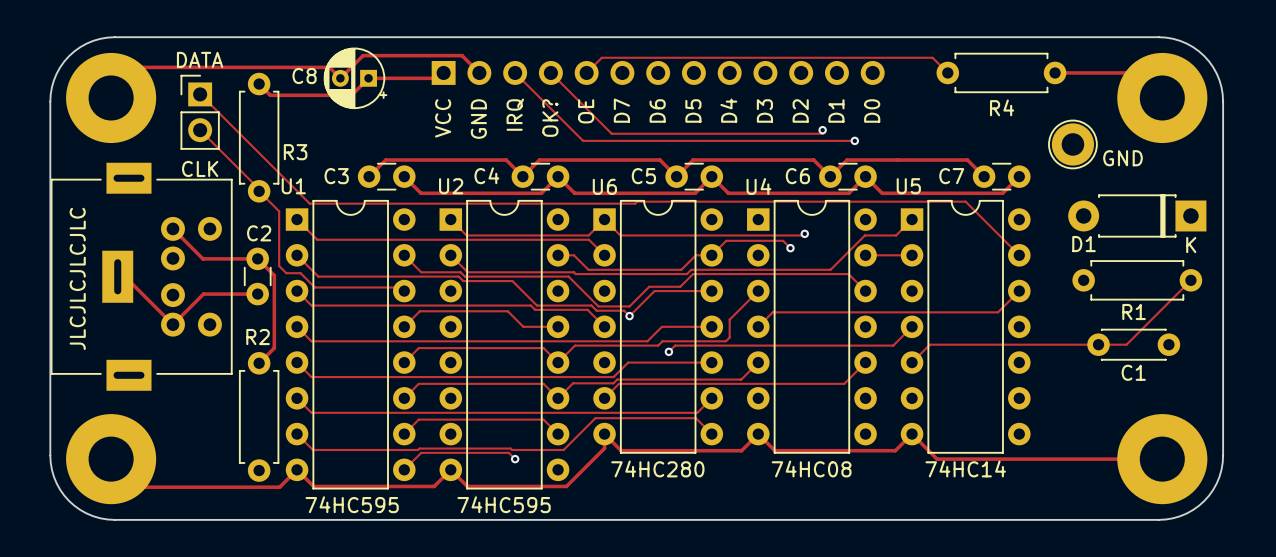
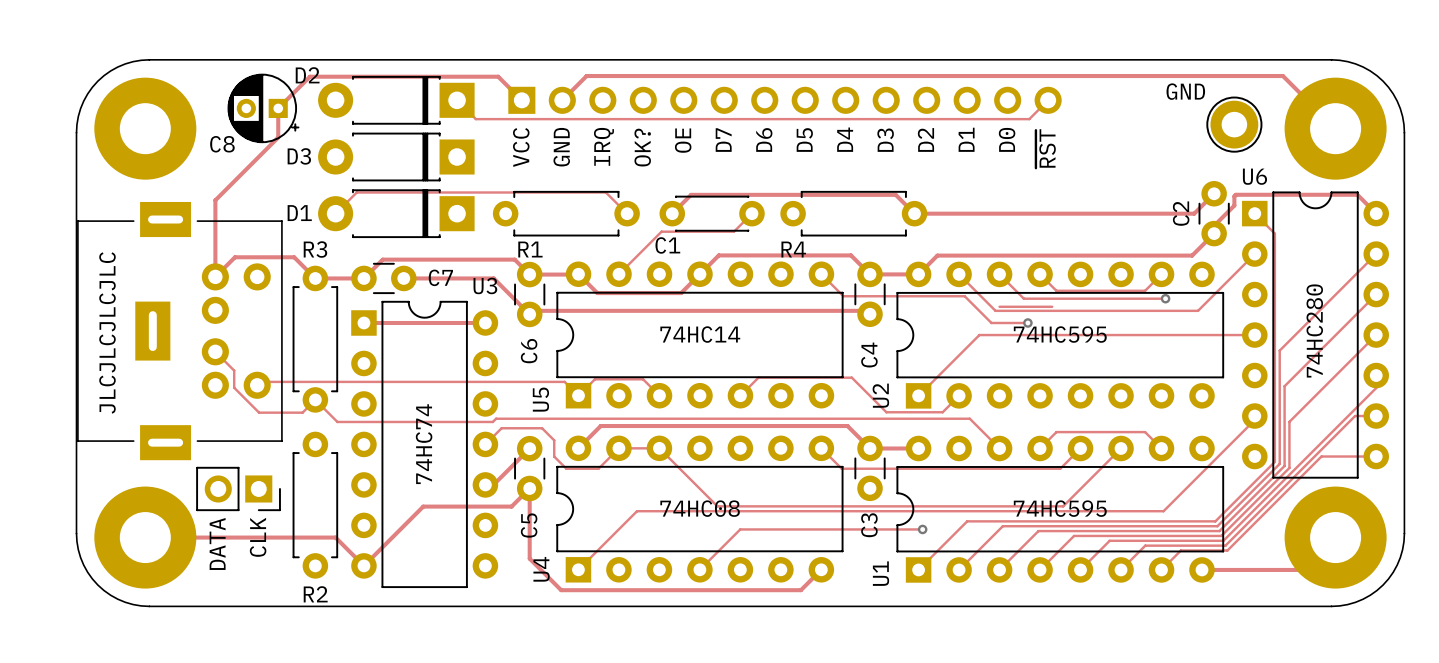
text: DATA (200, 59) -> none
track: (141, 67) (329, 67) (340, 78) (363, 55) (462, 55) (479, 72) -> (1335, 128) (1282, 76) (586, 76) (562, 100)
D2: none -> (396, 100)
track: none -> (457, 100) (475, 119) (1029, 119) (1048, 100)
track: none -> (521, 100) (498, 76) (309, 76) (278, 108) (278, 137) (215, 200) (215, 276) (235, 257) (294, 257) (310, 273)
track: (515, 72) (583, 140) (854, 140) -> none
track: (550, 72) (611, 133) (822, 133) (822, 130) -> none
track: (586, 72) (601, 57) (932, 57) (947, 72) -> none
part: (658, 72) -> none
part: none -> (785, 100)
R4 position: (1001, 72) -> (853, 213)
track: (1055, 72) (1137, 72) -> none
C8 name position: C8 (304, 76) -> C8 (222, 144)
C8 position: (355, 78) -> (263, 108)
track: (438, 78) (368, 78) (351, 95) (270, 95) (259, 84) -> none
track: (200, 94) (309, 203) (965, 201) (1019, 255) -> none
R4 name position: R4 (1002, 107) -> R4 (793, 249)
part: (200, 112) -> none
text: none -> ~{RST} (1045, 148)
D3: none -> (396, 157)
track: (200, 130) (259, 189) -> none
via: (822, 130) -> none
R3 position: (259, 137) -> (315, 339)
via: (854, 140) -> none
part position: (1072, 144) -> (1234, 124)
R3 name position: R3 (295, 152) -> R3 (315, 249)
track: none -> (1214, 193) (1194, 213) (914, 213) (895, 194) (691, 194) (672, 213)
part value position: GND (1122, 158) -> GND (1185, 91)
text rotation: 0° (200, 168) -> 90° counterclockwise (258, 537)
text position: CLK (200, 168) -> CLK (258, 537)
track: none -> (335, 213) (356, 192) (605, 192) (627, 213)
track: none -> (751, 213) (733, 231) (661, 231) (619, 274)
track: none -> (1254, 213) (1274, 233) (1274, 461) (1215, 521) (967, 521) (918, 569)
track: none -> (1376, 213) (1357, 194) (1235, 194) (1234, 205) (1214, 225)
C4 name position: C4 (486, 175) -> C4 (869, 355)
C3 name position: C3 (336, 176) -> C3 (869, 525)
track: (369, 176) (385, 160) (506, 160) (522, 176) (539, 160) (659, 160) (676, 176) (693, 160) (813, 160) (830, 176) (846, 160) (967, 160) (984, 176) -> none
C3 rotation: 0° (386, 176) -> 90° clockwise (870, 468)
C3 position: (386, 176) -> (870, 468)
track: (404, 176) (420, 193) (541, 193) (558, 176) (574, 193) (695, 193) (711, 176) (728, 193) (848, 193) (865, 176) (882, 193) (1002, 193) (1019, 176) -> none
C4 rotation: 0° (540, 176) -> 90° clockwise (870, 294)
C4 position: (540, 176) -> (870, 294)
C5 name position: C5 (643, 176) -> C5 (529, 525)
C5 rotation: 0° (694, 176) -> 90° clockwise (529, 468)
C5 position: (694, 176) -> (529, 468)
C6 name position: C6 (797, 176) -> C6 (529, 351)
C6 rotation: 0° (847, 176) -> 90° clockwise (529, 294)
C6 position: (847, 176) -> (529, 294)
C7 name position: C7 (951, 176) -> C7 (440, 277)
C7 position: (1001, 176) -> (383, 278)
track: none -> (1214, 233) (1192, 255) (937, 255) (918, 274) (870, 274) (851, 255) (718, 255) (681, 293) (597, 293) (578, 274)
track: (259, 191) (279, 211) (279, 266) (286, 273) (300, 273) (314, 287) (400, 287) -> none
track: none -> (1254, 254) (1198, 310) (995, 310) (959, 274)
track: none -> (1376, 254) (1279, 350) (1279, 463) (1217, 526) (1002, 526) (959, 569)
D1 position: (1137, 215) -> (396, 213)
track: (297, 219) (317, 239) (588, 239) (604, 255) -> none
track: (450, 219) (466, 235) (588, 235) (604, 219) (620, 235) (803, 235) (804, 233) -> none
track: (912, 219) (896, 235) (864, 235) (830, 269) (691, 269) (686, 274) (467, 272) (450, 255) -> none
track: none -> (578, 274) (529, 274) (514, 259) (382, 259) (363, 278) (315, 278)
track: none -> (821, 274) (843, 296) (964, 296) (991, 322) (1027, 322)
track: none -> (999, 274) (1023, 298) (1165, 298)
track: none -> (1040, 274) (1056, 290) (1145, 290) (1161, 274)
track: (172, 228) (202, 258) (257, 258) (274, 275) (274, 348) (259, 363) -> none
track: none -> (403, 278) (493, 278) (529, 314)
C2 name rotation: 0° (259, 233) -> 90° counterclockwise (1181, 213)
C2 name position: C2 (259, 233) -> C2 (1181, 213)
via: (804, 233) -> none
D1 name position: D1 (1084, 244) -> D1 (299, 213)
track: none -> (1376, 294) (1284, 386) (1284, 465) (1219, 531) (1038, 531) (999, 569)
D1 text: K (1191, 245) -> none
track: (790, 248) (783, 240) (726, 240) (711, 255) (695, 255) (681, 269) (588, 269) (573, 255) (558, 255) -> none
via: (790, 248) -> none
via: none -> (1165, 298)
track: (297, 255) (318, 276) (458, 276) (463, 281) (512, 281) (536, 305) (591, 305) (596, 310) (624, 310) (629, 316) (654, 291) (711, 291) -> none
track: (404, 255) (421, 272) (460, 272) (464, 276) (568, 276) (598, 306) (629, 306) (649, 286) (680, 286) (693, 274) (848, 274) (865, 291) -> none
track: none -> (533, 310) (866, 310)
track: none -> (363, 322) (485, 322)
via: none -> (1027, 322)
track: (117, 276) (125, 276) (172, 324) (203, 294) (257, 294) -> none
C2 position: (257, 276) -> (1214, 213)
text: none -> 74HC280 (1314, 330)
text: none -> 74HC14 (700, 334)
text: none -> 74HC595 (1060, 334)
track: none -> (1254, 335) (979, 335) (918, 395)
R1 position: (1137, 280) -> (566, 213)
track: (1190, 280) (1126, 344) (929, 344) (912, 362) -> none
track: none -> (1376, 335) (1289, 421) (1289, 467) (1221, 535) (1074, 535) (1040, 569)
track: (297, 291) (311, 305) (530, 305) (535, 309) (587, 309) (604, 326) -> none
track: (758, 291) (729, 319) (729, 337) (725, 341) (662, 341) (658, 345) (575, 345) (558, 362) (543, 348) (418, 348) (404, 362) -> none
track: (1019, 291) (998, 312) (772, 312) (758, 326) -> none
track: none -> (215, 351) (234, 370) (234, 387) (259, 412) (302, 412) (315, 399) (337, 421) (492, 421) (496, 418) (969, 418) (999, 448)
R1 name position: R1 (1134, 311) -> R1 (530, 249)
via: (629, 316) -> none
track: none -> (1376, 375) (1376, 388) (1223, 540) (1109, 540) (1080, 569)
track: none -> (260, 381) (564, 381) (578, 395) (594, 379) (643, 379) (659, 395)
track: (297, 326) (311, 341) (647, 341) (661, 326) (711, 326) -> none
track: (404, 326) (419, 311) (507, 311) (523, 326) (558, 326) -> none
U6 position: (658, 326) -> (1315, 335)
U4 rotation: 0° (811, 326) -> 90° counterclockwise (699, 509)
U4 position: (811, 326) -> (699, 509)
track: (912, 326) (893, 345) (675, 345) (668, 351) -> none
U5 rotation: 0° (965, 326) -> 90° counterclockwise (699, 334)
U5 position: (965, 326) -> (699, 334)
track: none -> (740, 395) (758, 377) (851, 377) (886, 412) (942, 412) (959, 395)
R2 name position: R2 (258, 337) -> R2 (315, 594)
U1 rotation: 0° (350, 344) -> 90° counterclockwise (1060, 509)
U1 position: (350, 344) -> (1060, 509)
U2 rotation: 0° (504, 344) -> 90° counterclockwise (1060, 335)
U2 position: (504, 344) -> (1060, 335)
C1 position: (1133, 344) -> (712, 213)
via: (668, 351) -> none
track: none -> (1376, 416) (1355, 416) (1225, 545) (1145, 545) (1121, 569)
track: none -> (1254, 419) (1163, 511) (637, 511) (578, 569)
track: (297, 362) (311, 377) (613, 377) (628, 362) (711, 362) -> none
track: (758, 362) (741, 379) (617, 379) (613, 383) (573, 383) (558, 398) (543, 383) (418, 383) (404, 398) -> none
track: (865, 362) (844, 383) (619, 383) (604, 398) -> none
C1 name position: C1 (1133, 372) -> C1 (667, 245)
text: none -> 74HC74 (424, 444)
U3: none -> (424, 444)
track: none -> (485, 444) (501, 428) (542, 428) (554, 440) (554, 456) (566, 468) (598, 468) (618, 448) (659, 448) (717, 506) (1063, 506) (1121, 448)
track: none -> (529, 448) (493, 484)
track: none -> (578, 448) (600, 426) (847, 426) (870, 448) (918, 448)
track: none -> (821, 448) (841, 468) (1060, 468) (1080, 448)
track: none -> (1040, 448) (1056, 432) (1145, 432) (1161, 448)
track: none -> (1376, 456) (1321, 456) (1227, 550) (1180, 550) (1161, 569)
track: (297, 398) (311, 412) (697, 412) (711, 398) -> none
part: none -> (238, 488)
R2 position: (259, 416) -> (315, 505)
text: none -> 74HC595 (1060, 508)
track: (297, 434) (312, 450) (563, 450) (595, 418) (695, 418) (711, 434) -> none
track: (404, 434) (418, 419) (543, 419) (558, 434) -> none
track: none -> (922, 529) (740, 529) (699, 569)
via: none -> (922, 529)
track: none -> (145, 537) (335, 537) (363, 565) (423, 506) (511, 506) (529, 488) (529, 558) (561, 590) (800, 590) (821, 569)
track: (515, 459) (508, 452) (421, 452) (404, 469) -> none
via: (515, 459) -> none
track: (1162, 459) (937, 459) (912, 434) (895, 450) (774, 450) (758, 434) (741, 450) (621, 450) (604, 434) (604, 448) (566, 486) (467, 486) (450, 469) (434, 486) (313, 486) (297, 469) (279, 487) (139, 487) -> none
text: none -> DATA (217, 543)
text: 74HC280 (657, 468) -> none
text position: 74HC08 (811, 468) -> 74HC08 (700, 508)
text: 74HC14 (965, 468) -> none
track: none -> (1202, 569) (1303, 569)
text: 74HC595 (352, 504) -> none
text: 74HC595 (504, 504) -> none

